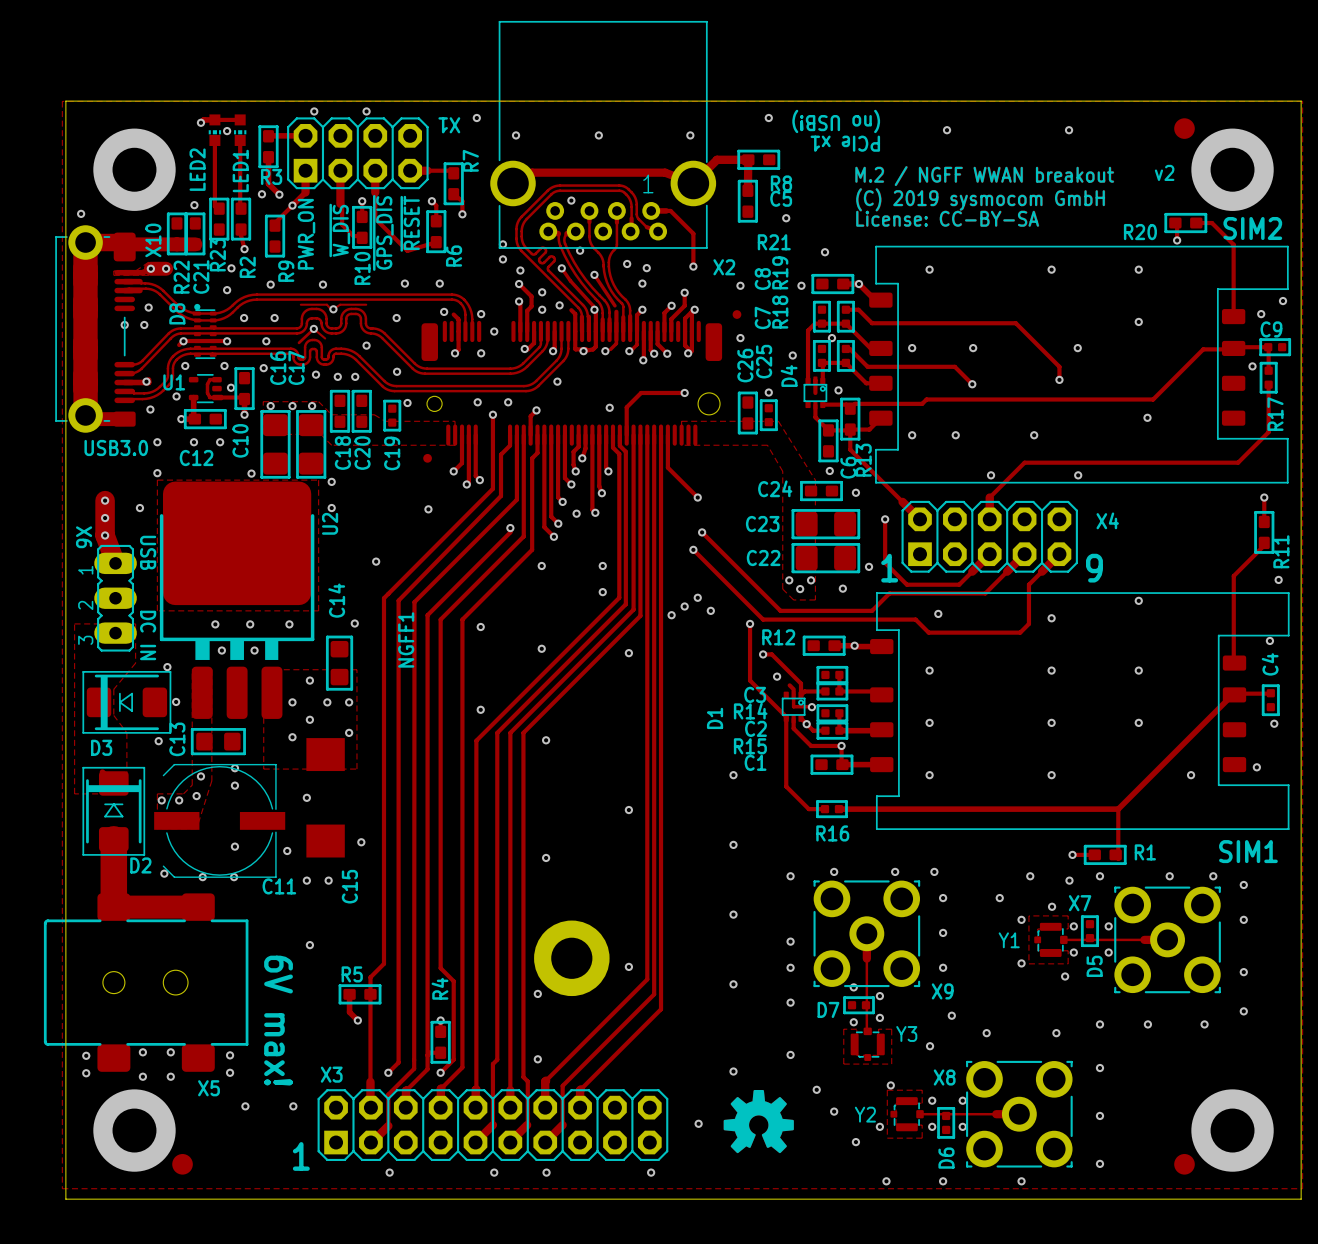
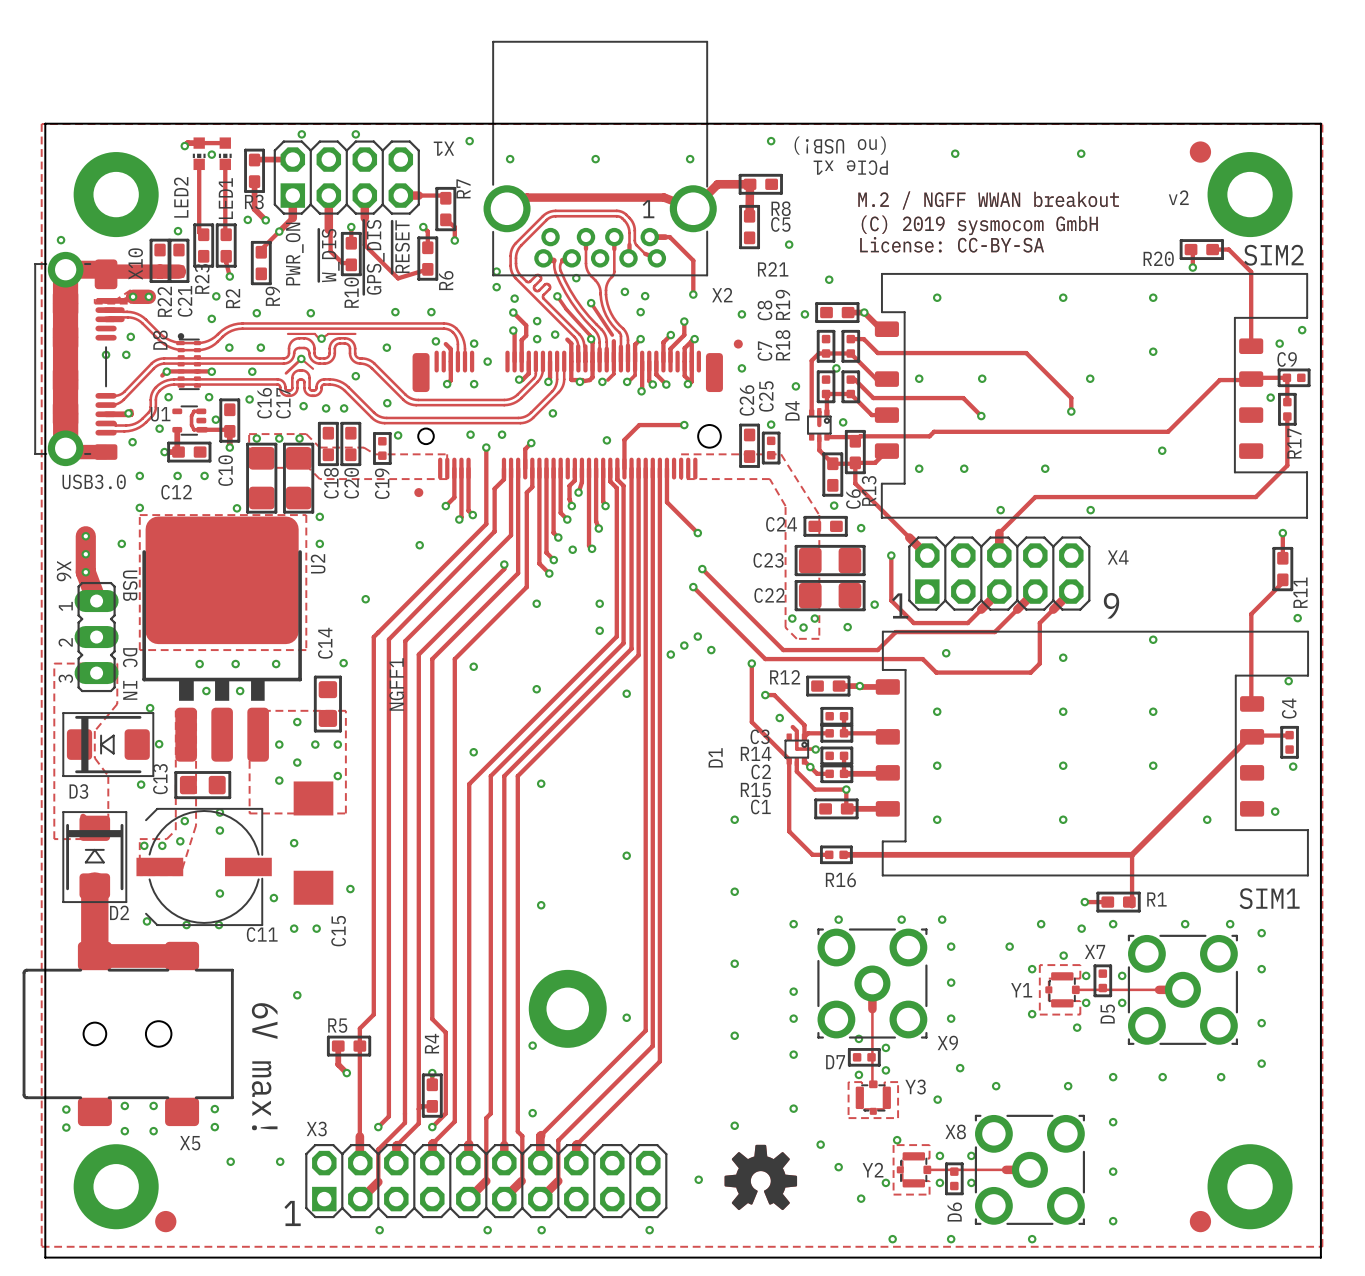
via: (571, 200) -> none

